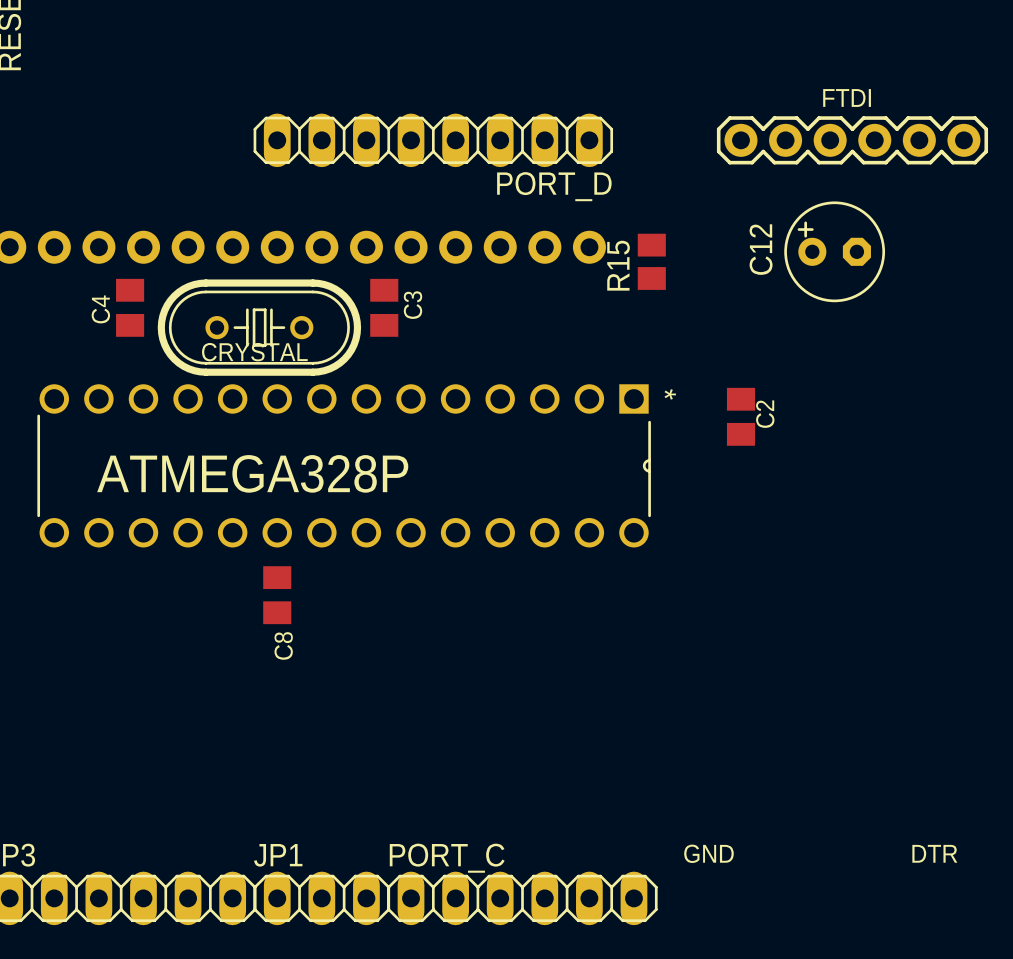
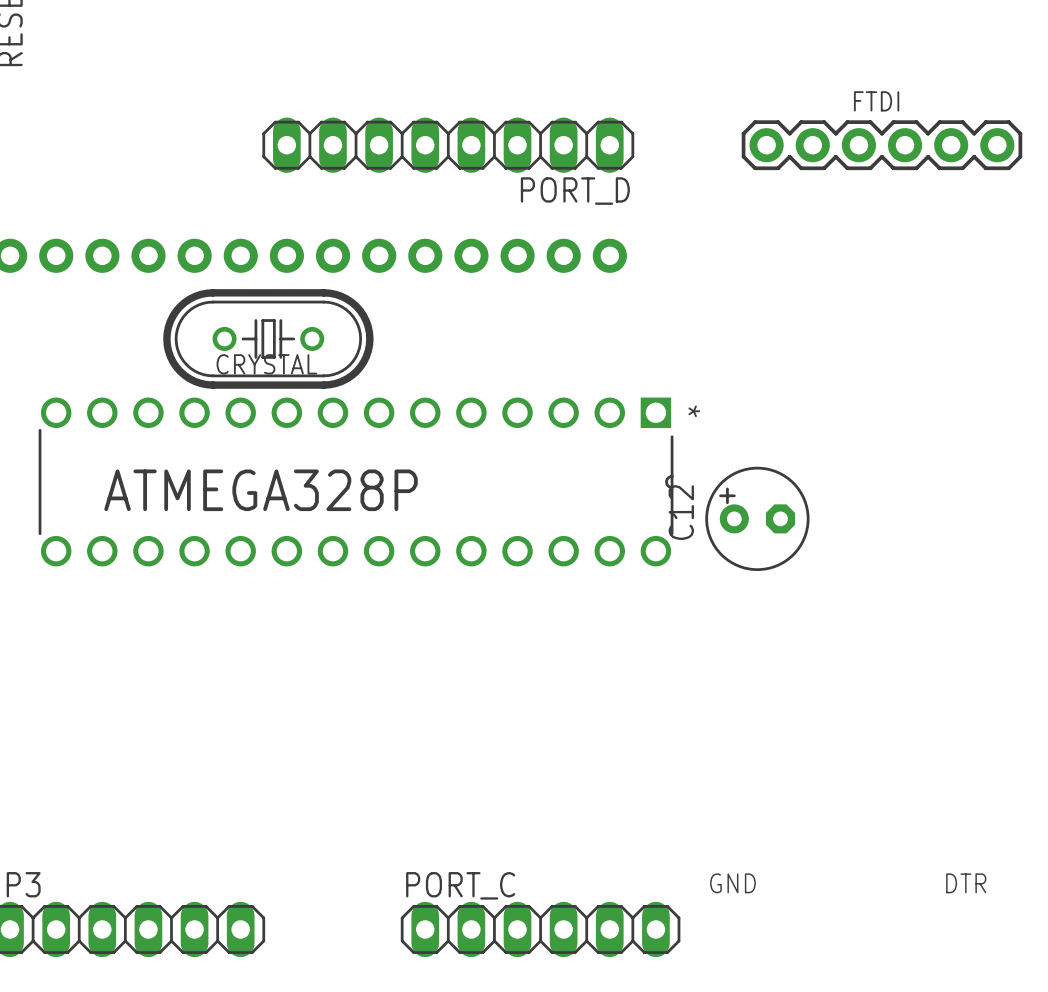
C12 position: (834, 251) -> (757, 518)
R15: (651, 261) -> none
C4: (130, 307) -> none
C3: (384, 307) -> none
C2: (740, 416) -> none
C8: (277, 595) -> none
JP1: (321, 898) -> none

